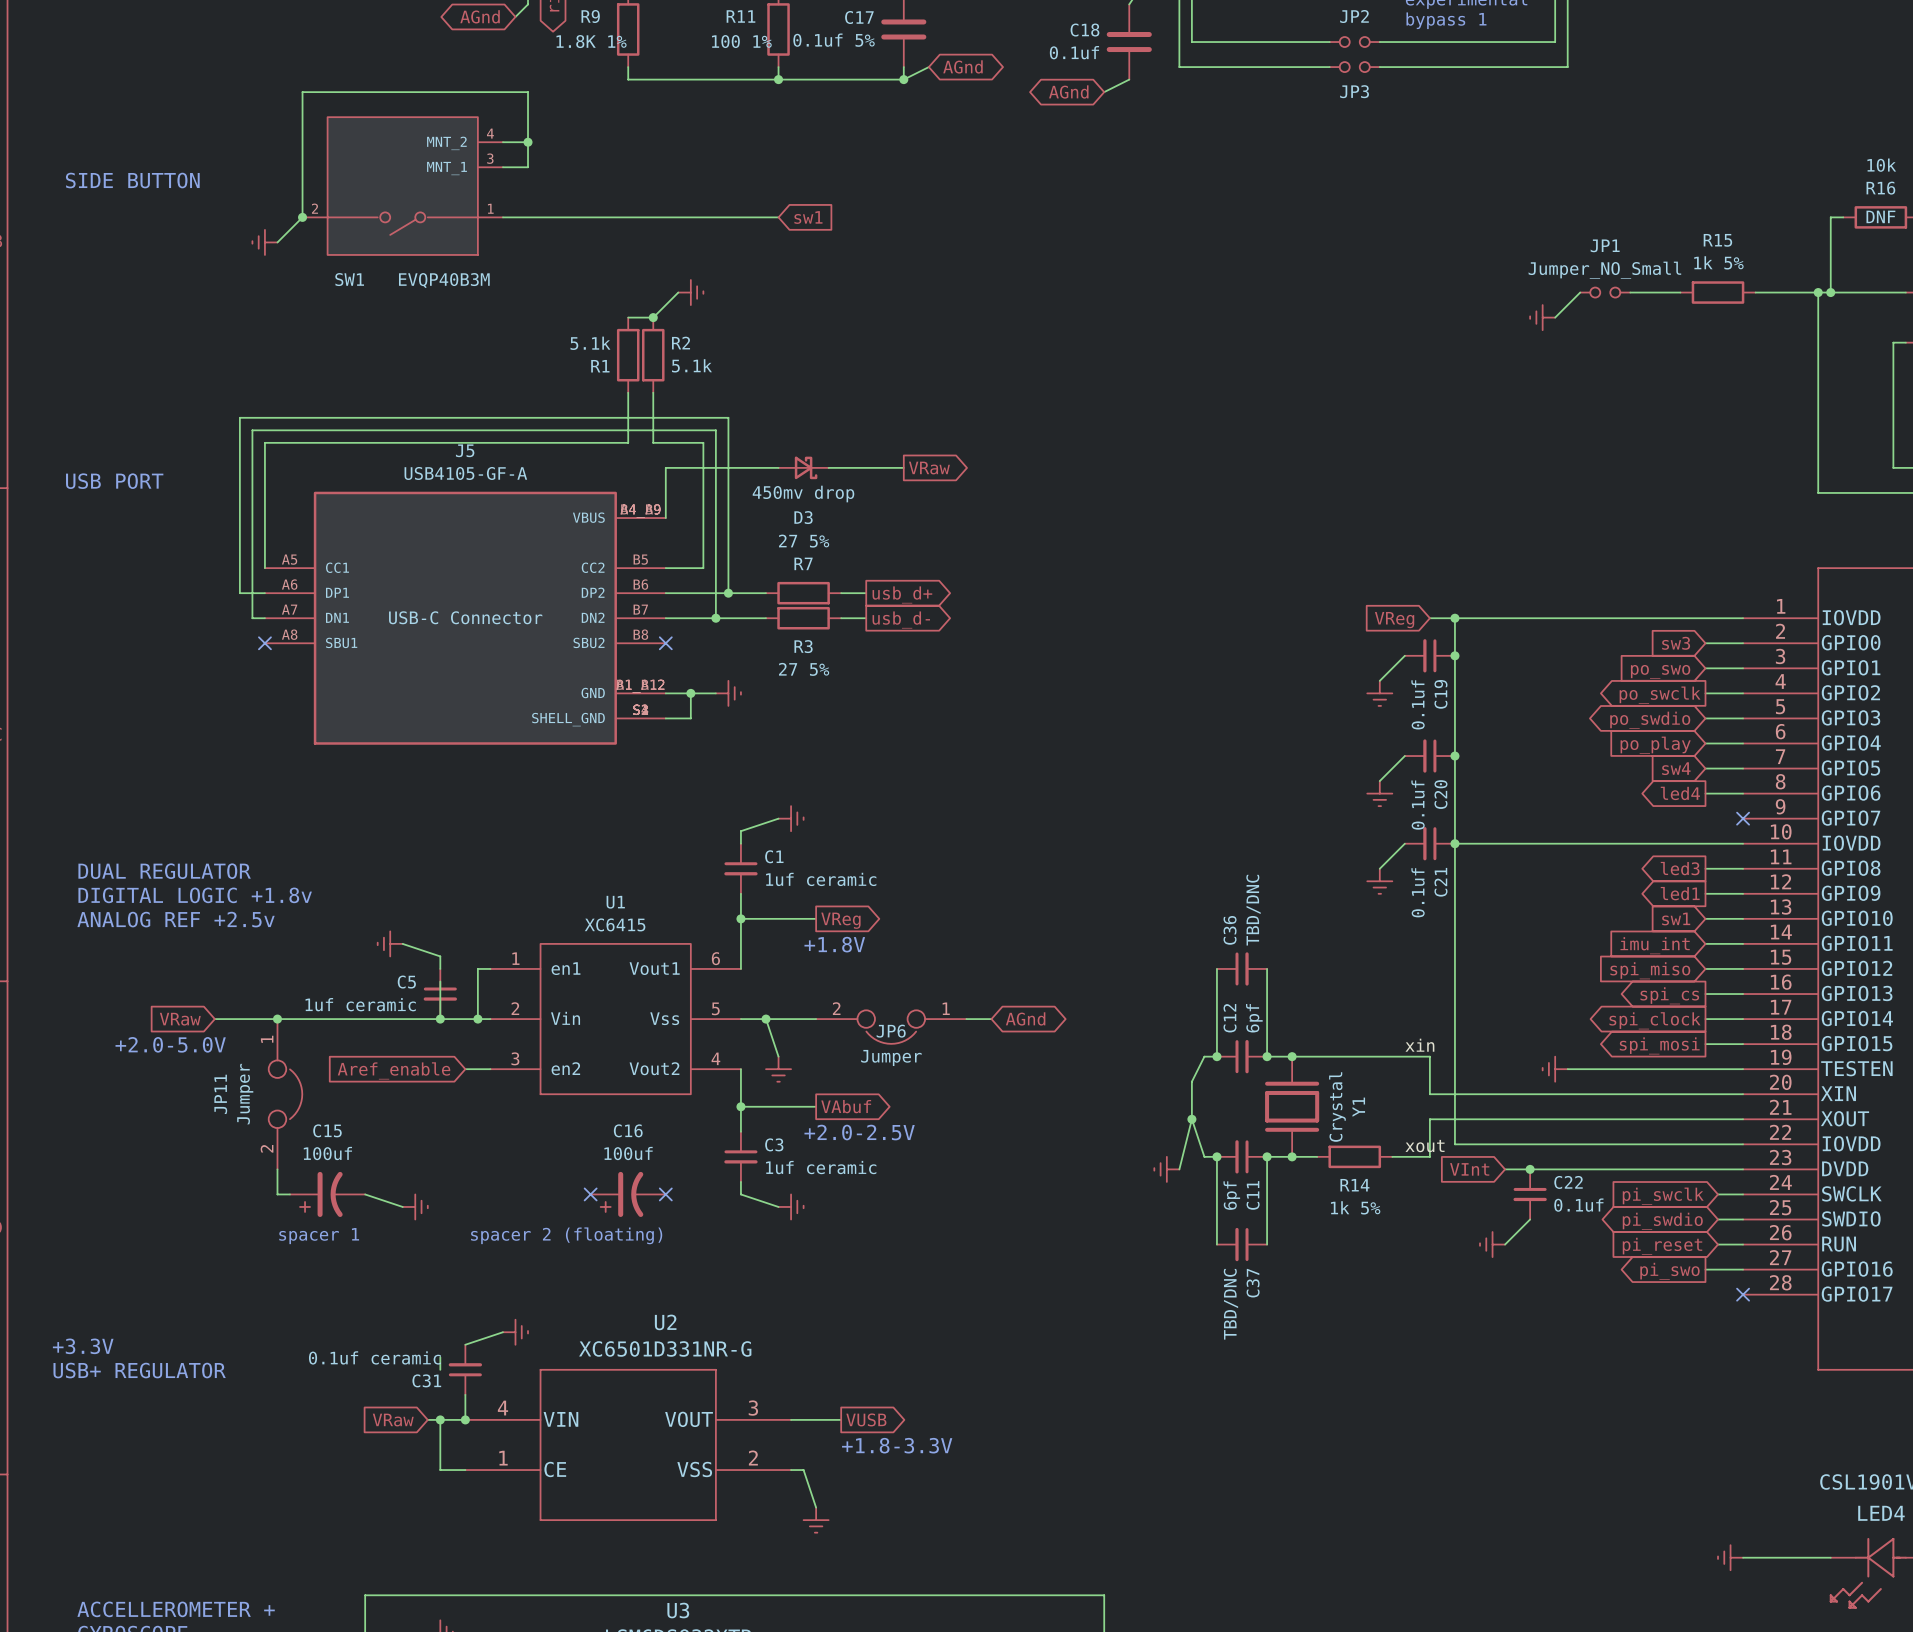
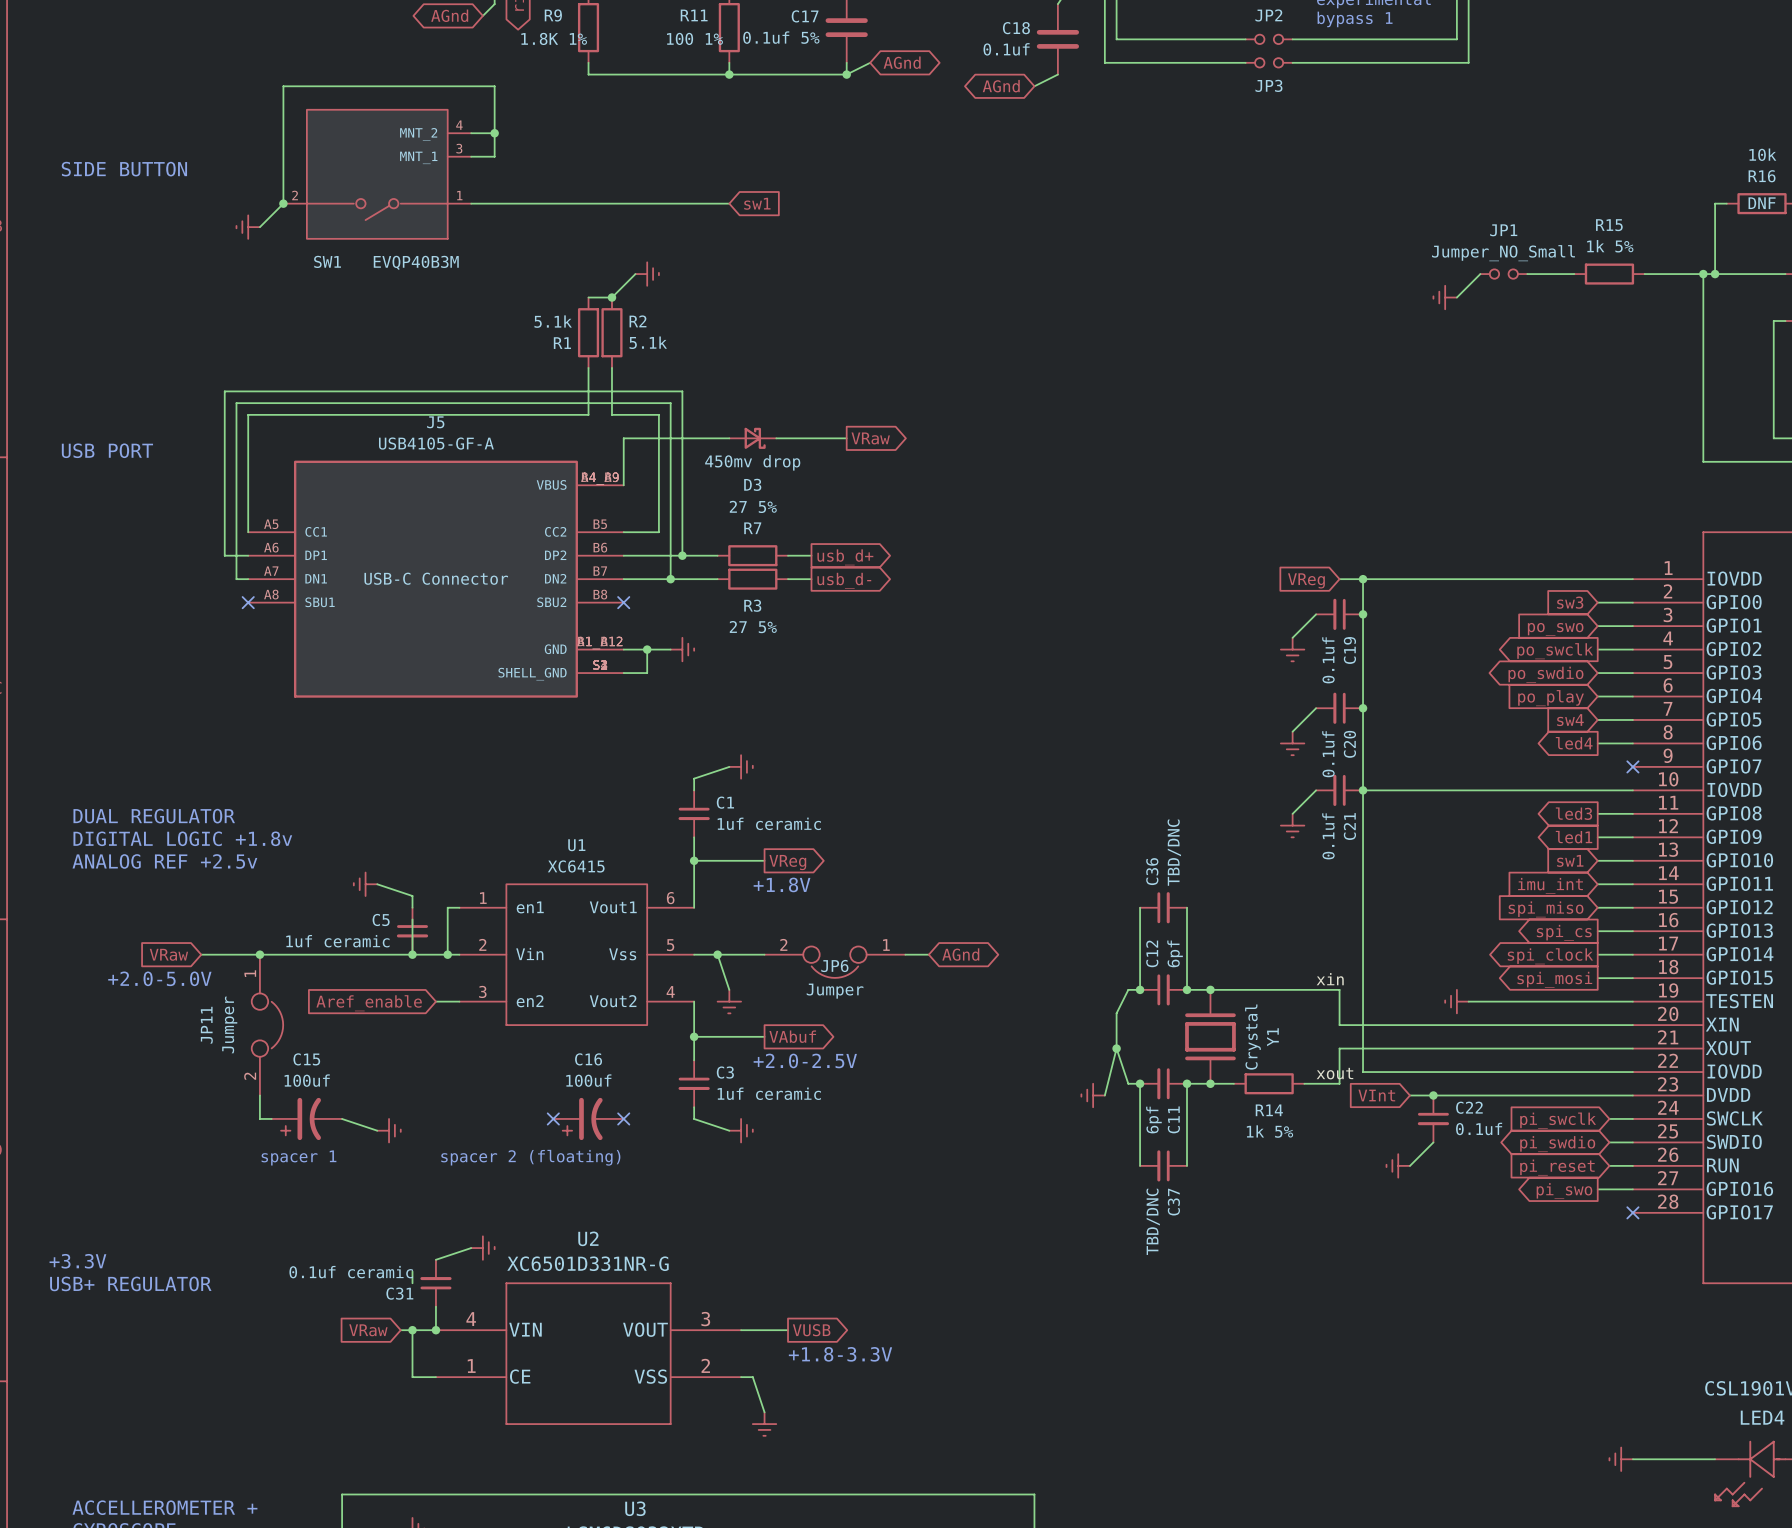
U2 name position: U2 (665, 1322) -> U2 (588, 1238)
U2 value position: XC6501D331NR-G (665, 1348) -> XC6501D331NR-G (588, 1263)

